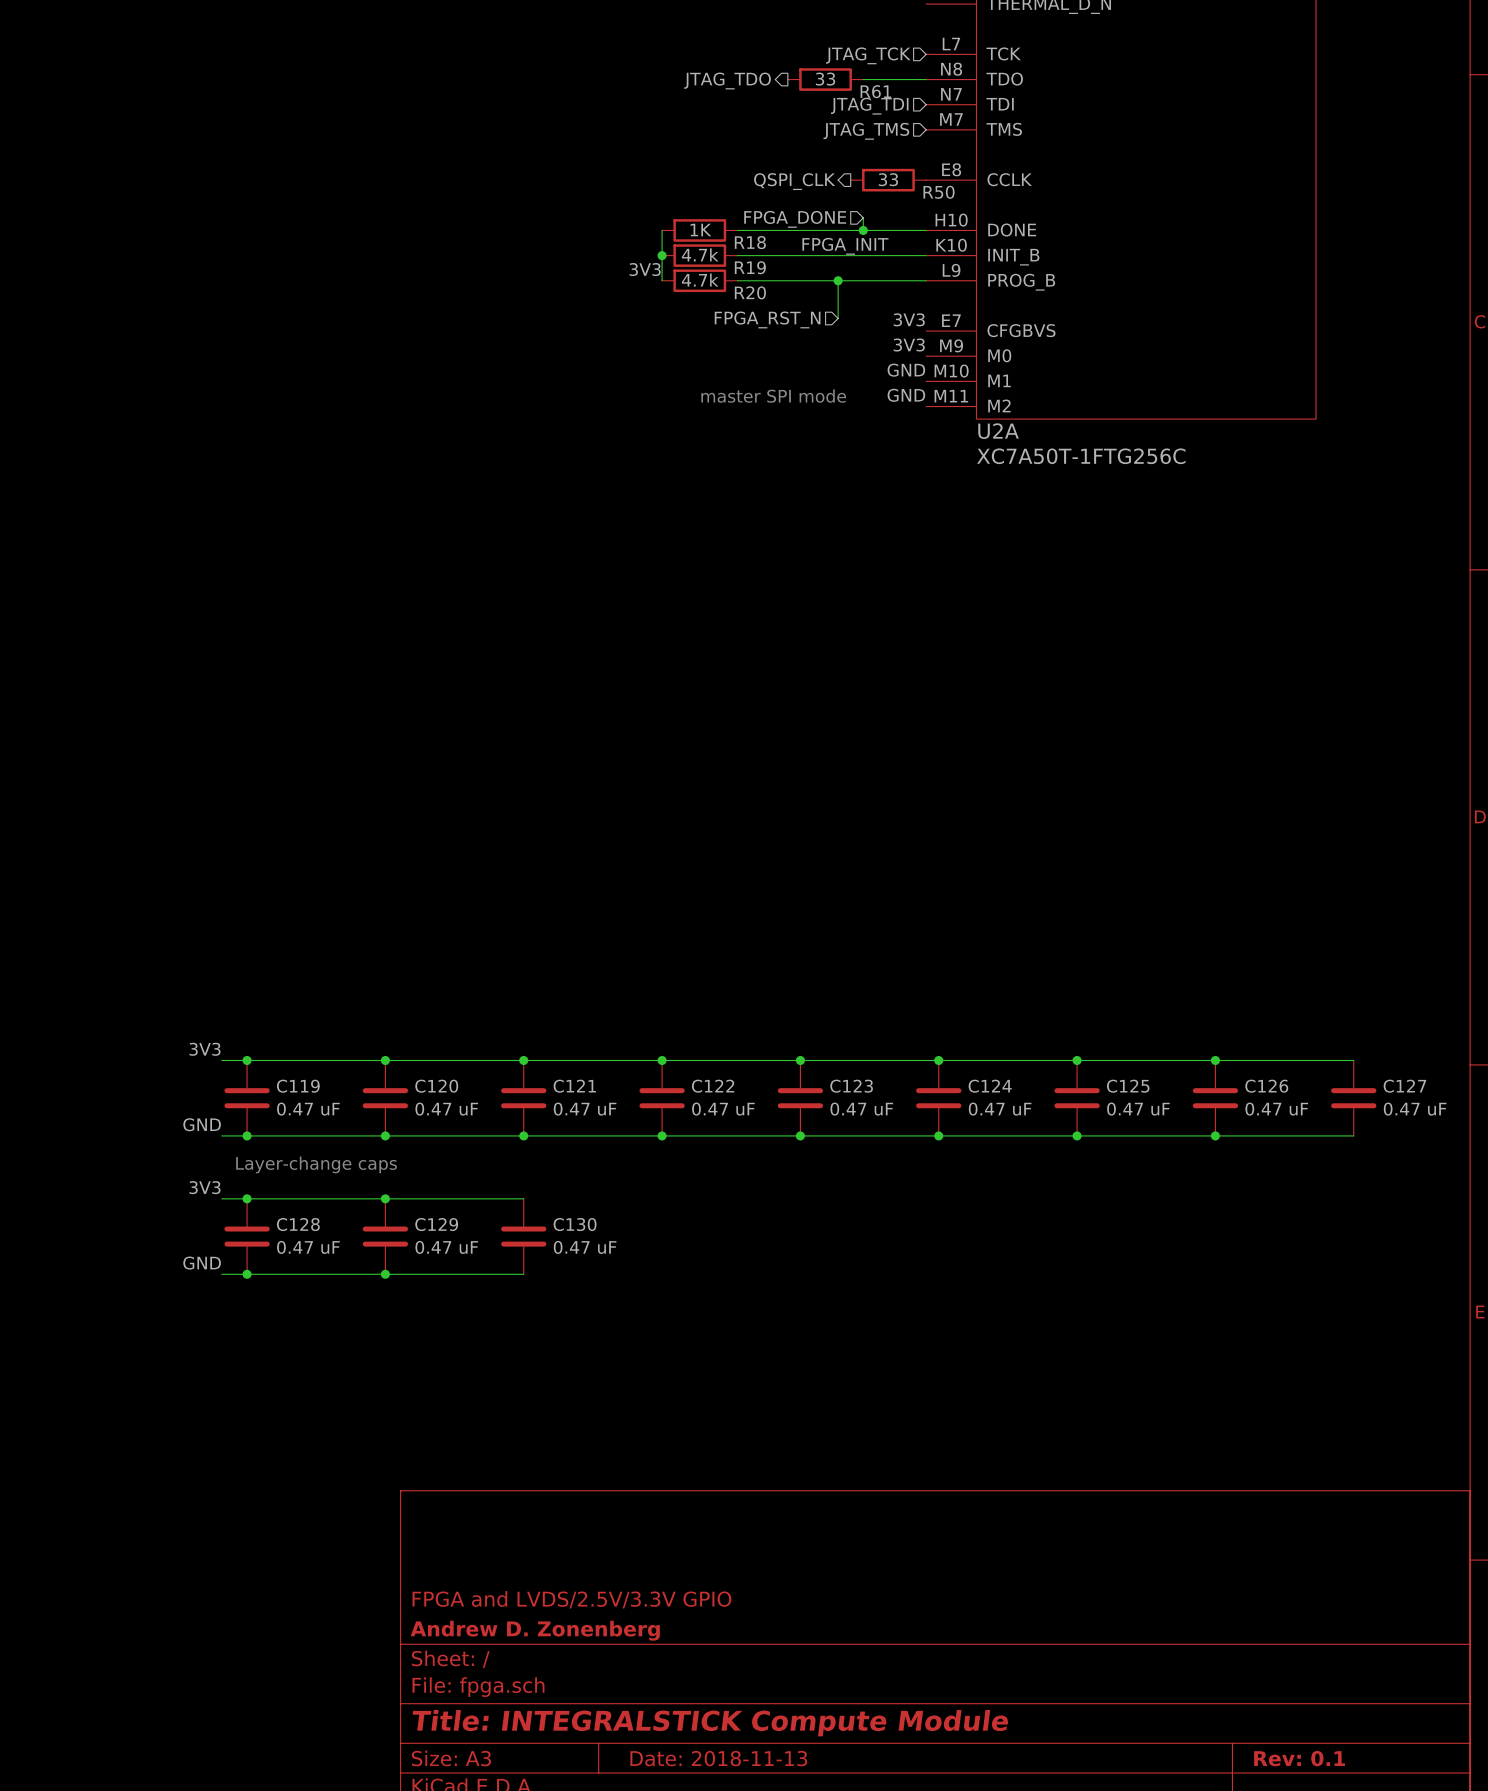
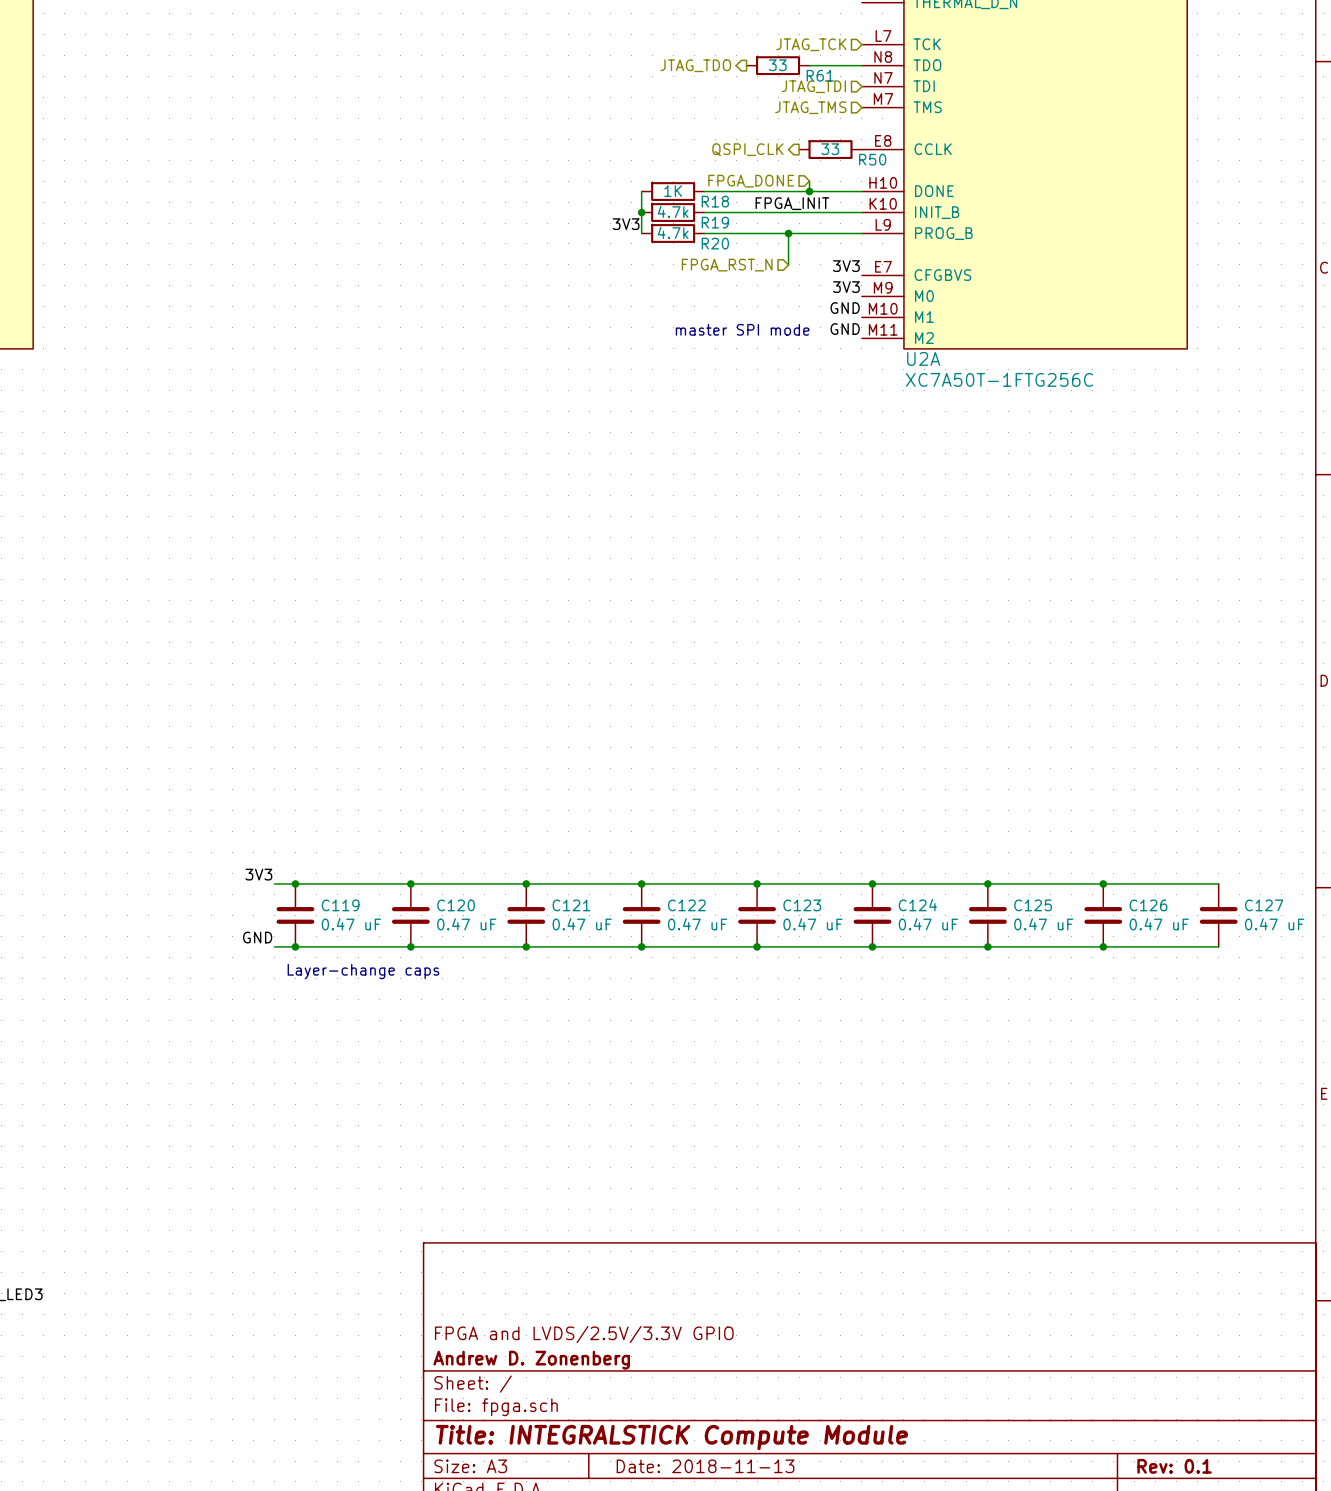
label: 3V3 (204, 1187) -> none
wire: (221, 1198) (523, 1198) -> none
junction: (247, 1198) -> none
junction: (385, 1198) -> none
C128: 0.47 uF (247, 1236) -> none
C129: 0.47 uF (385, 1236) -> none
C130: 0.47 uF (523, 1236) -> none
label: GND (202, 1263) -> none
wire: (221, 1274) (523, 1274) -> none
junction: (247, 1274) -> none
junction: (385, 1274) -> none

